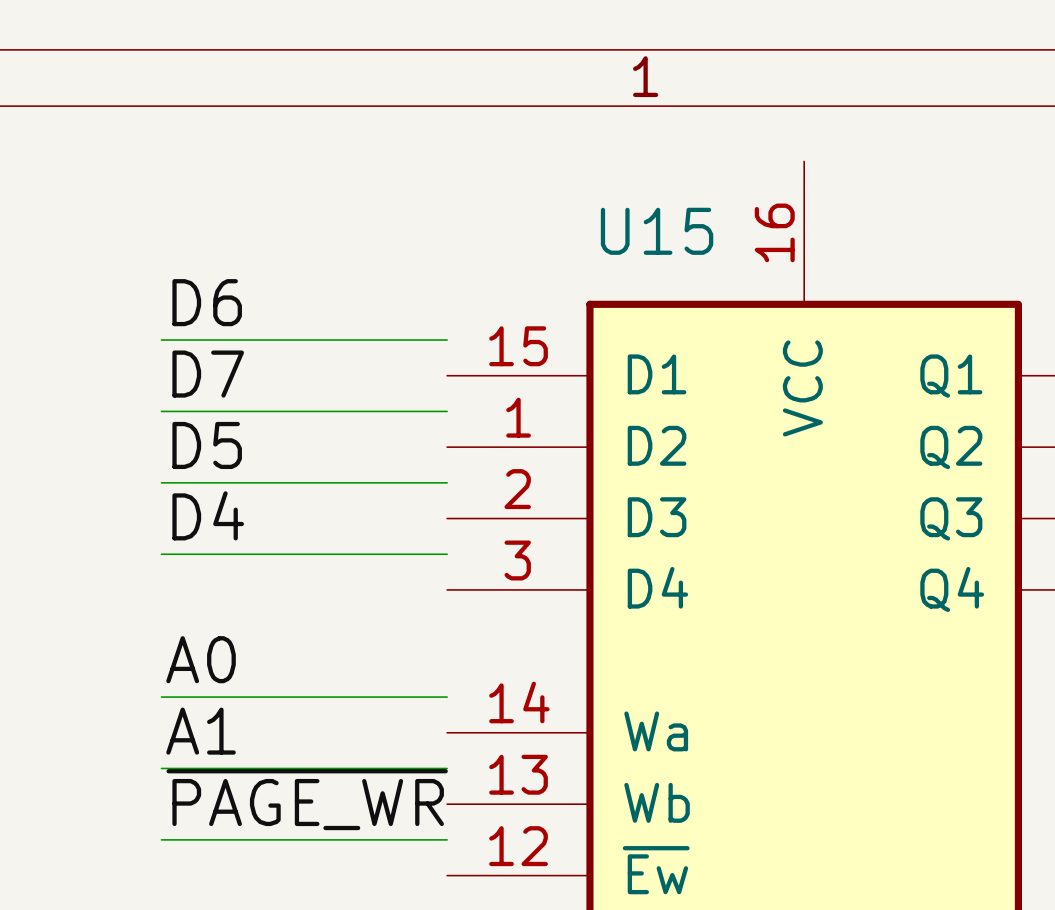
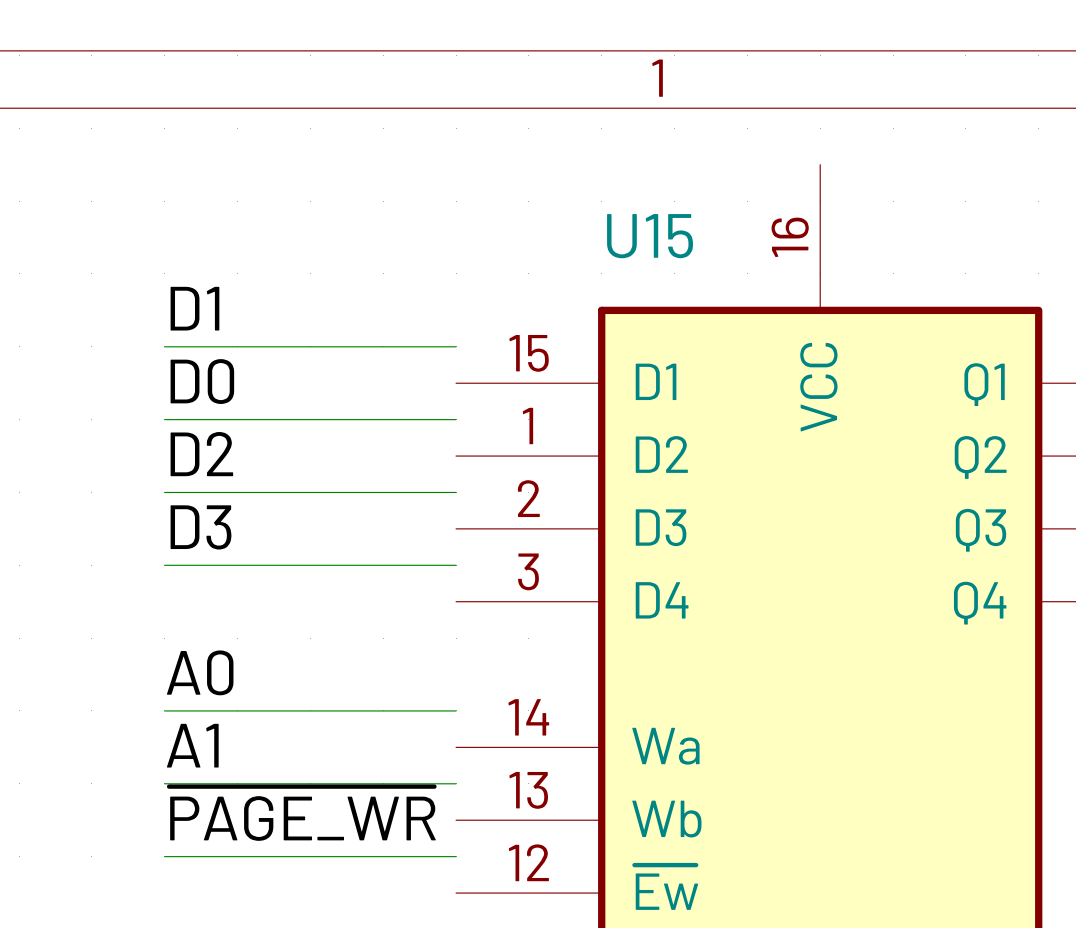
label: D6 (207, 302) -> D1 (194, 308)
label: D7 (208, 374) -> D0 (202, 381)
label: D5 (207, 445) -> D2 (201, 454)
label: D4 (208, 515) -> D3 (200, 527)

